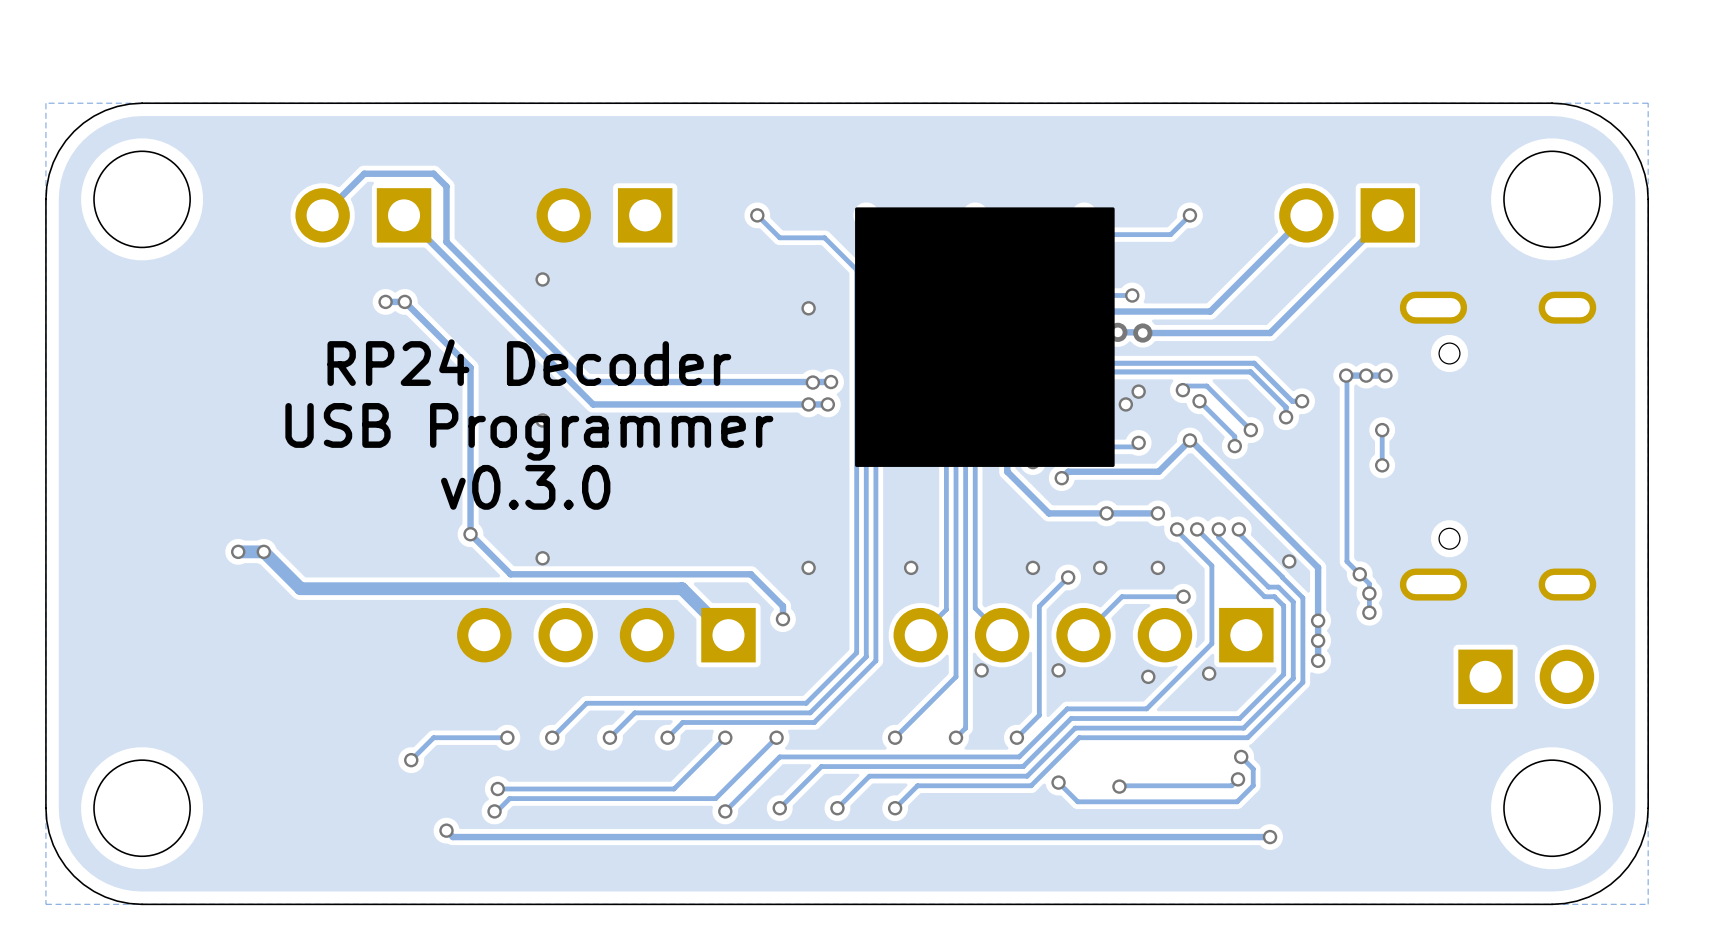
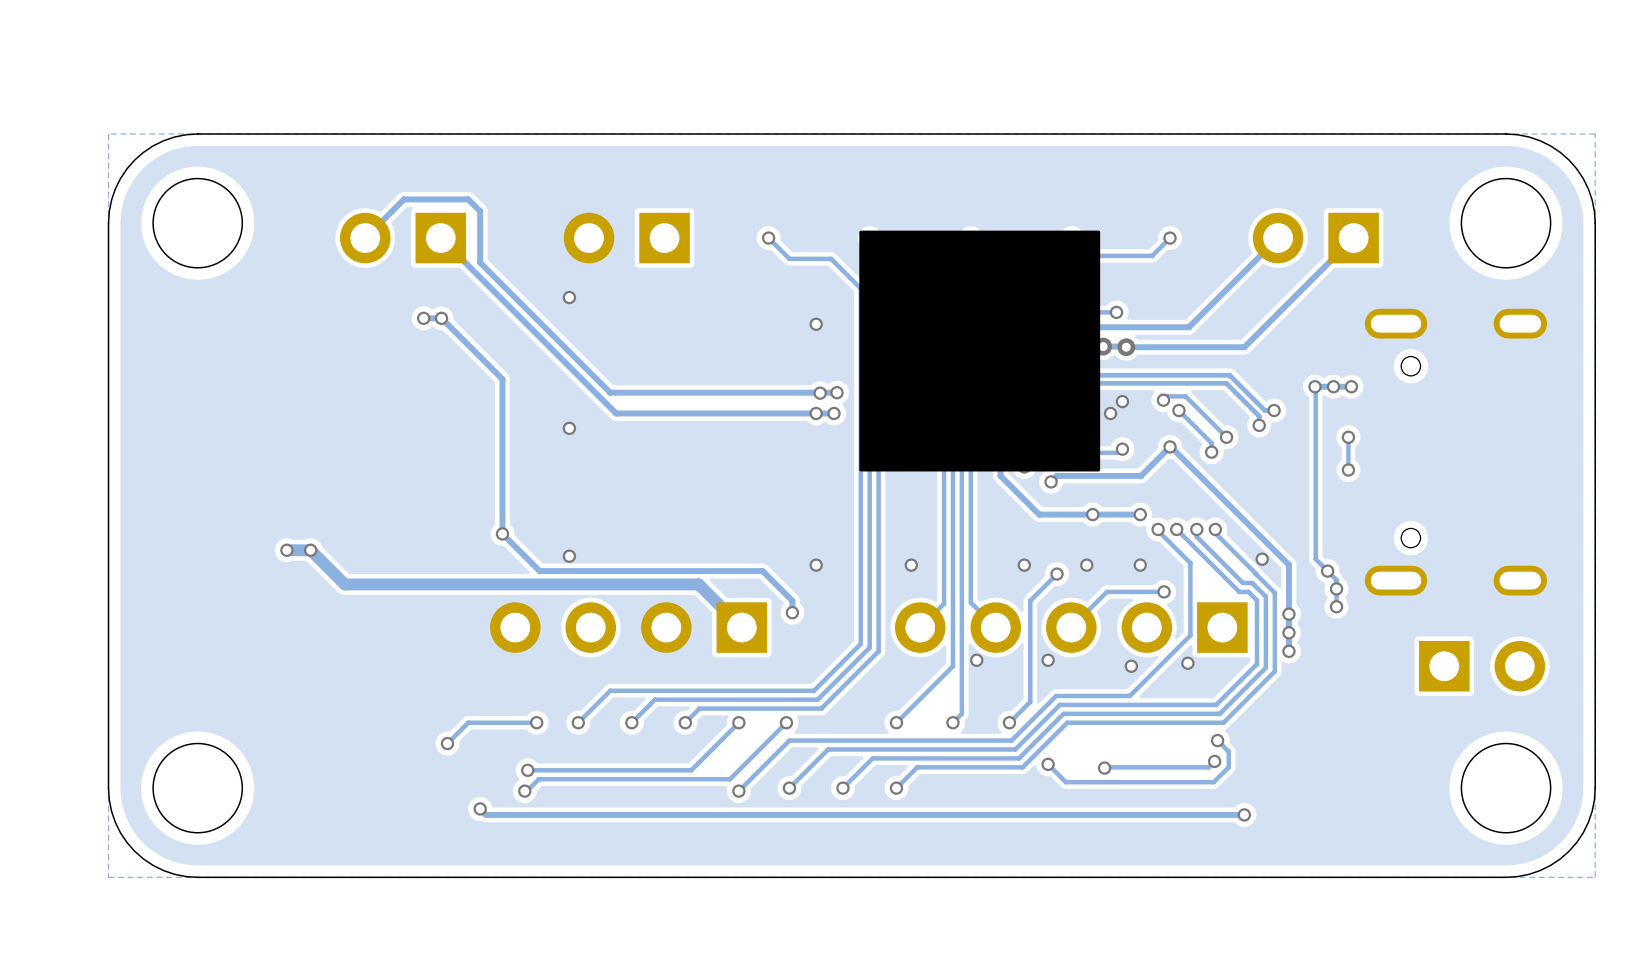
text: RP24 Decoder (529, 362) -> none
text: USB Programmer (529, 431) -> none
text: v0.3.0 (525, 487) -> none

